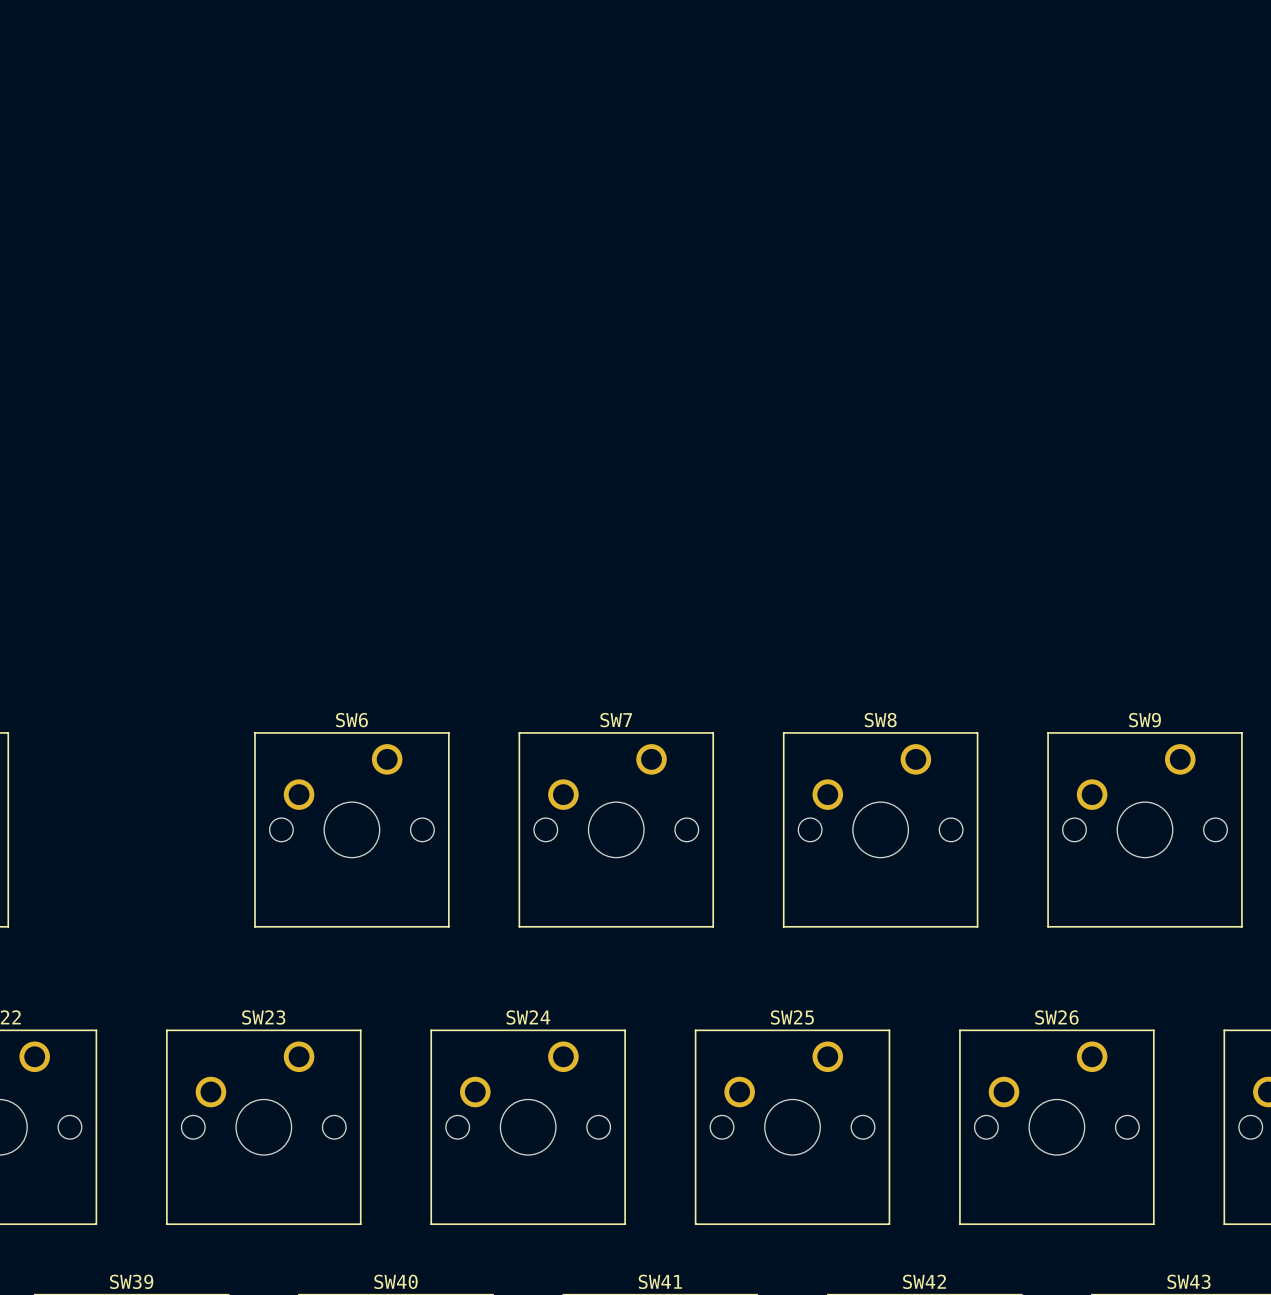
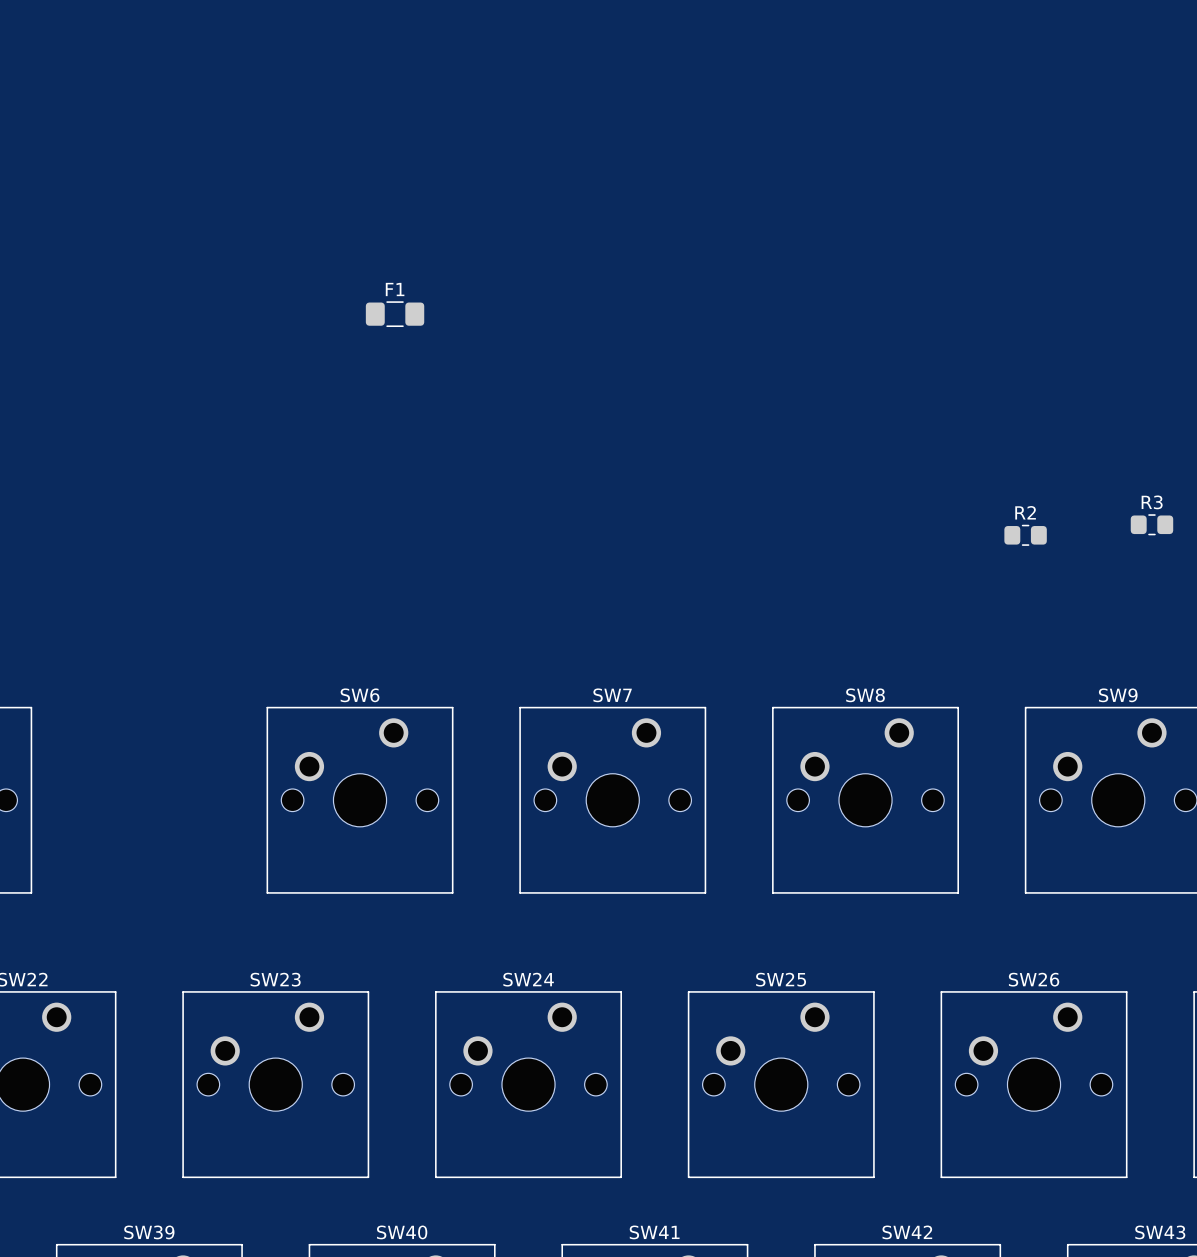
F1: none -> (395, 314)
R3: none -> (1151, 524)
R2: none -> (1025, 535)

